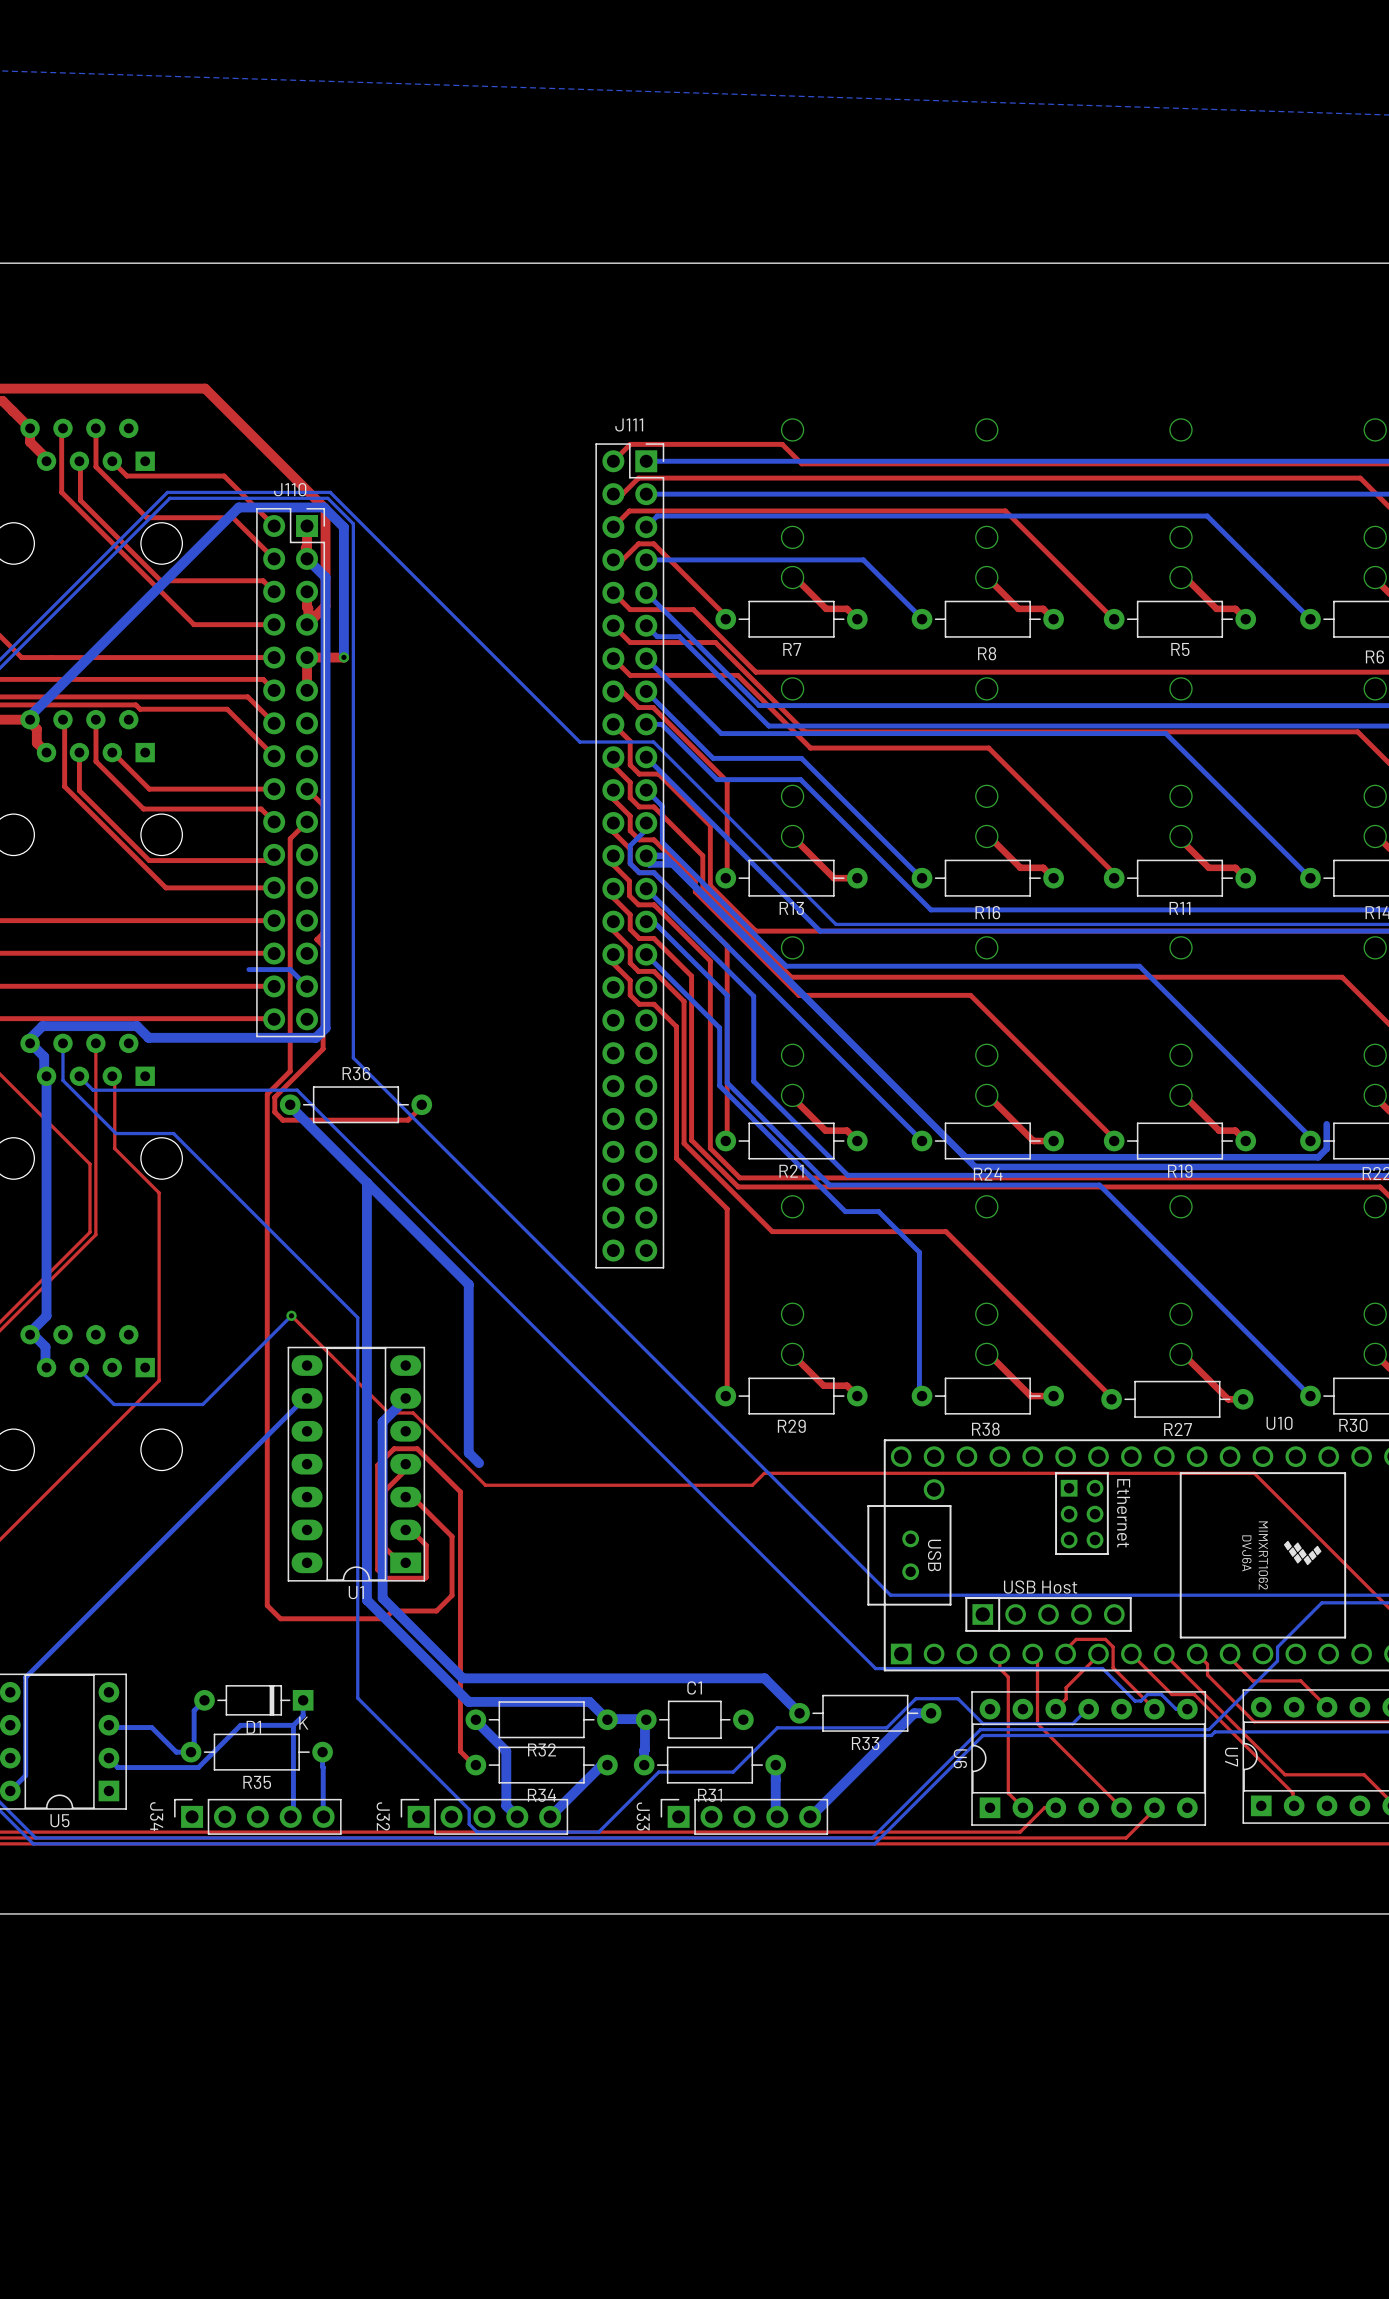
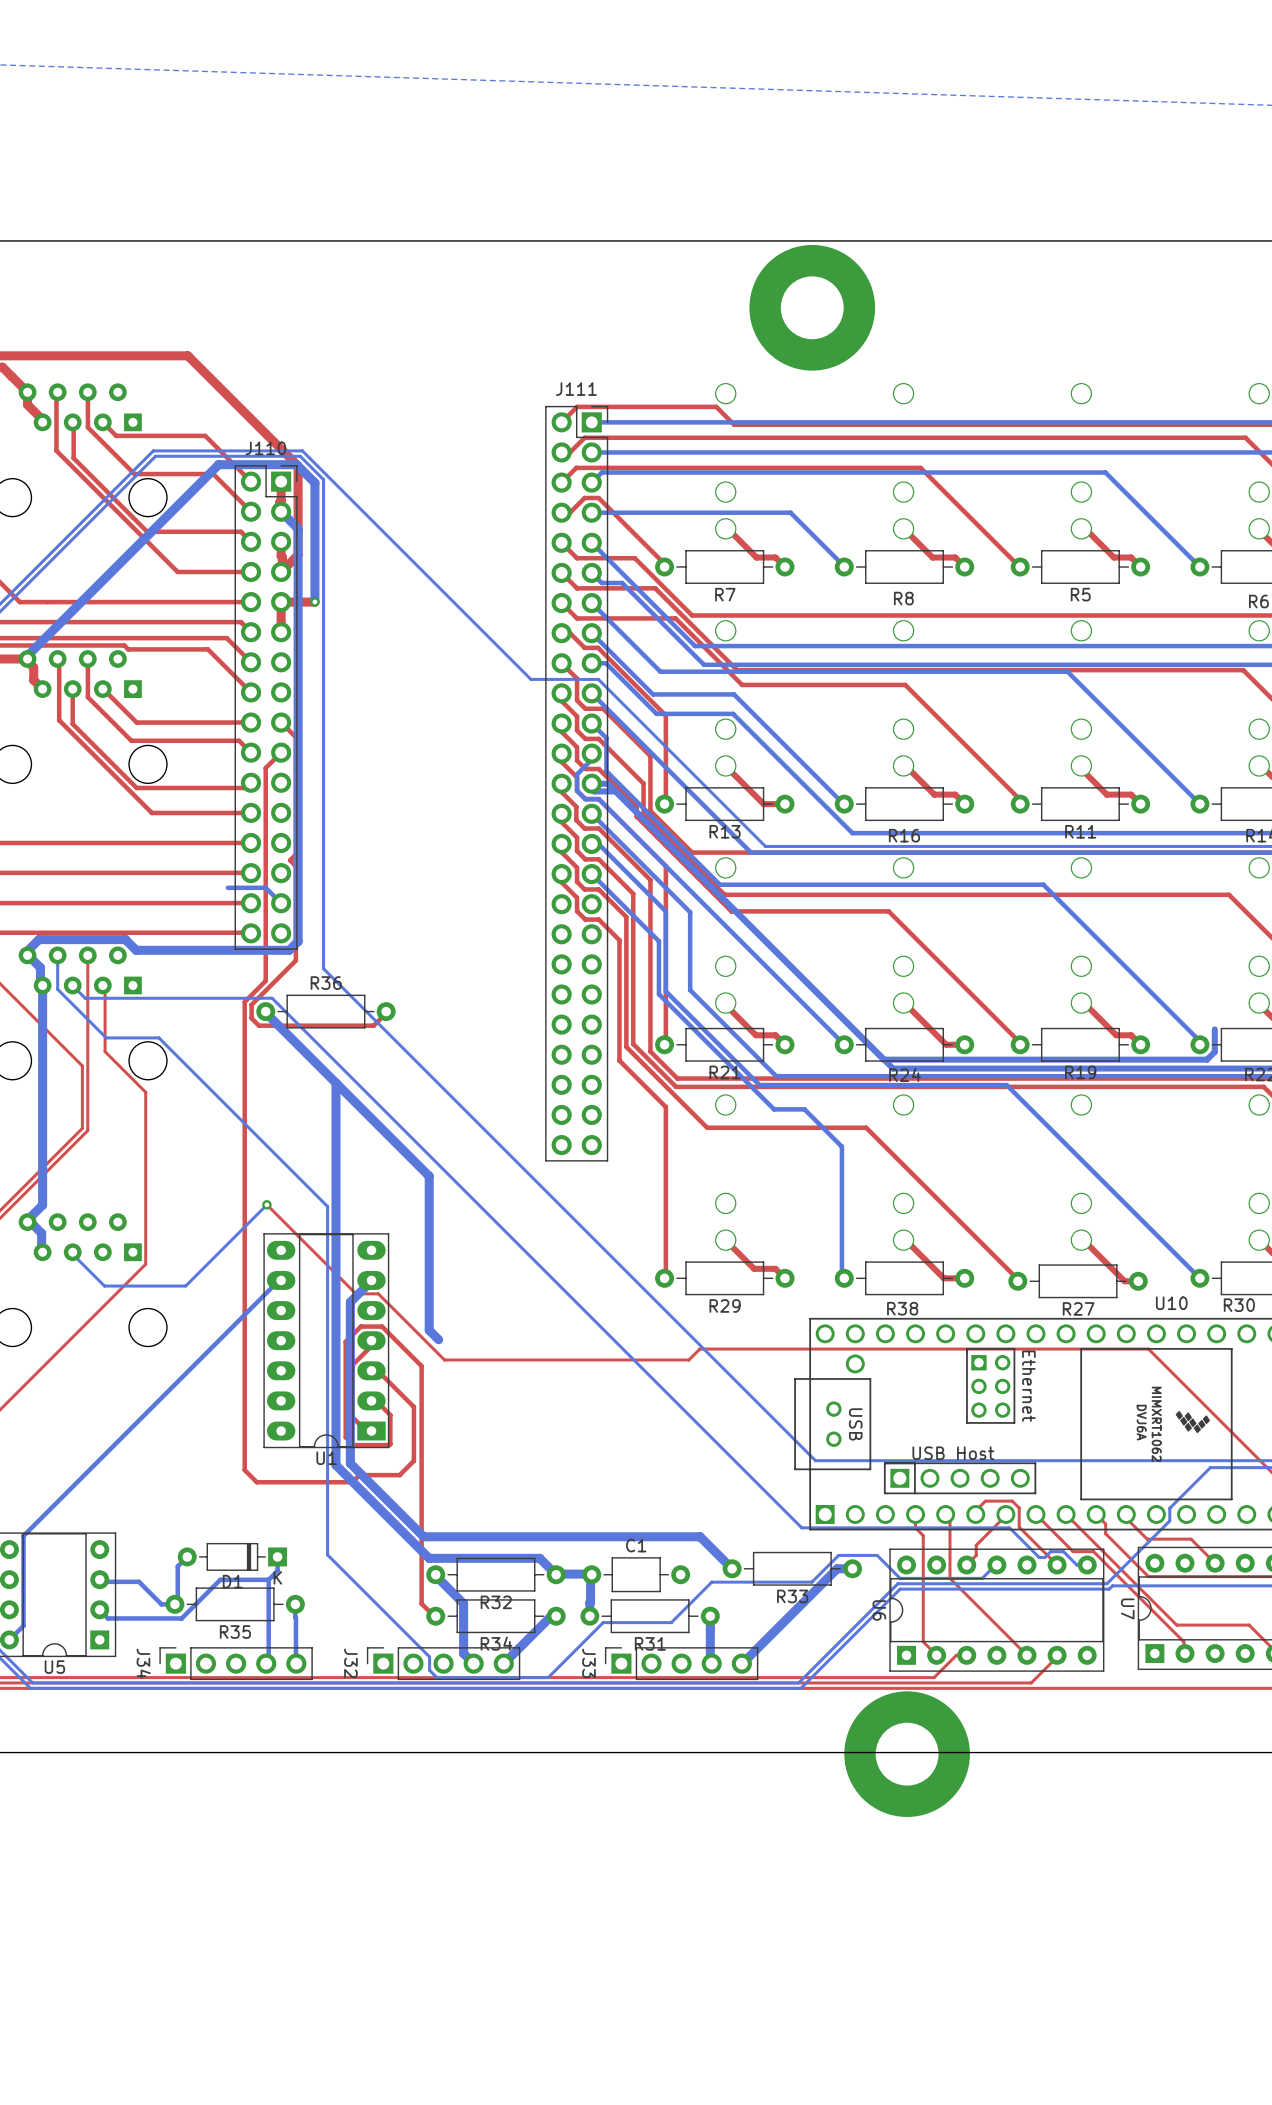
part: none -> (812, 307)
part: none -> (907, 1754)

